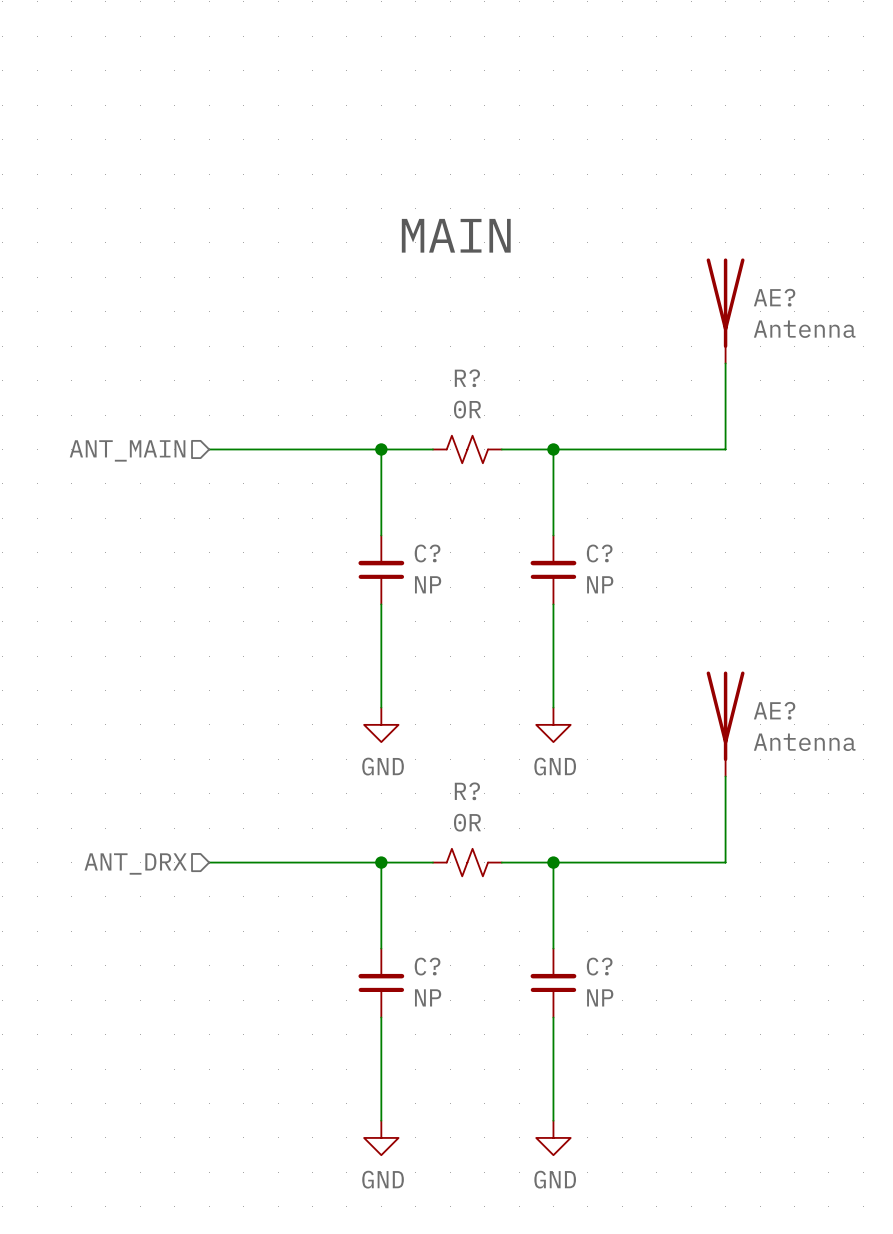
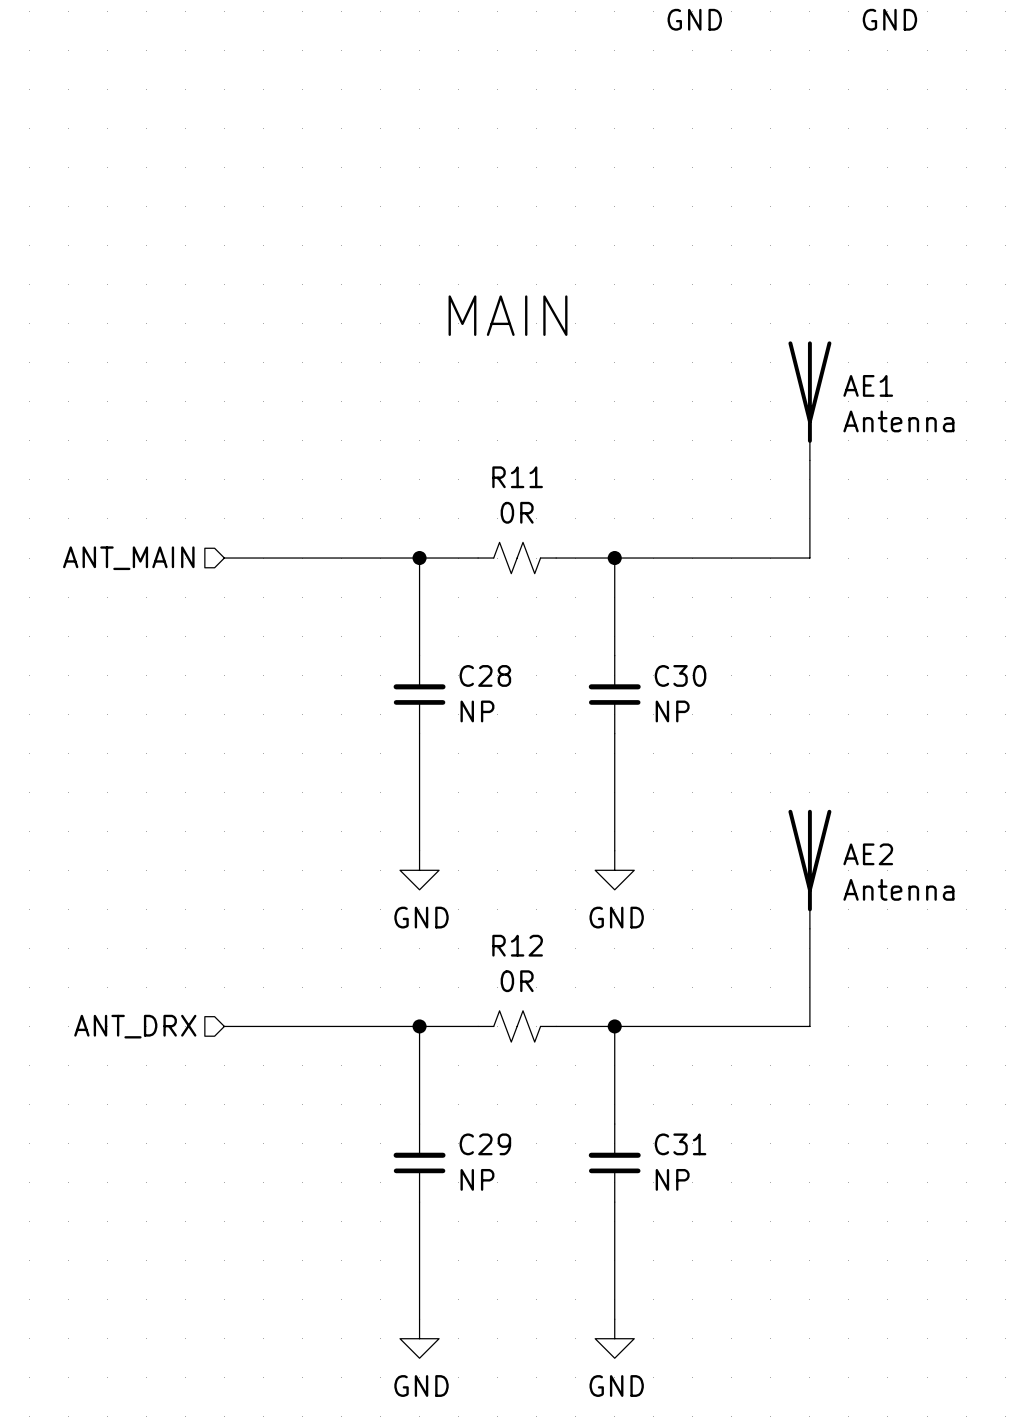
AE? name: AE? (774, 297) -> AE1 (868, 385)
R? name: R? (467, 378) -> R11 (517, 477)
C? name: C? (427, 553) -> C28 (485, 675)
C? name: C? (599, 553) -> C30 (680, 675)
AE? name: AE? (774, 710) -> AE2 (868, 854)
R? name: R? (467, 791) -> R12 (517, 945)
C? name: C? (427, 966) -> C29 (485, 1144)
C? name: C? (599, 966) -> C31 (680, 1144)

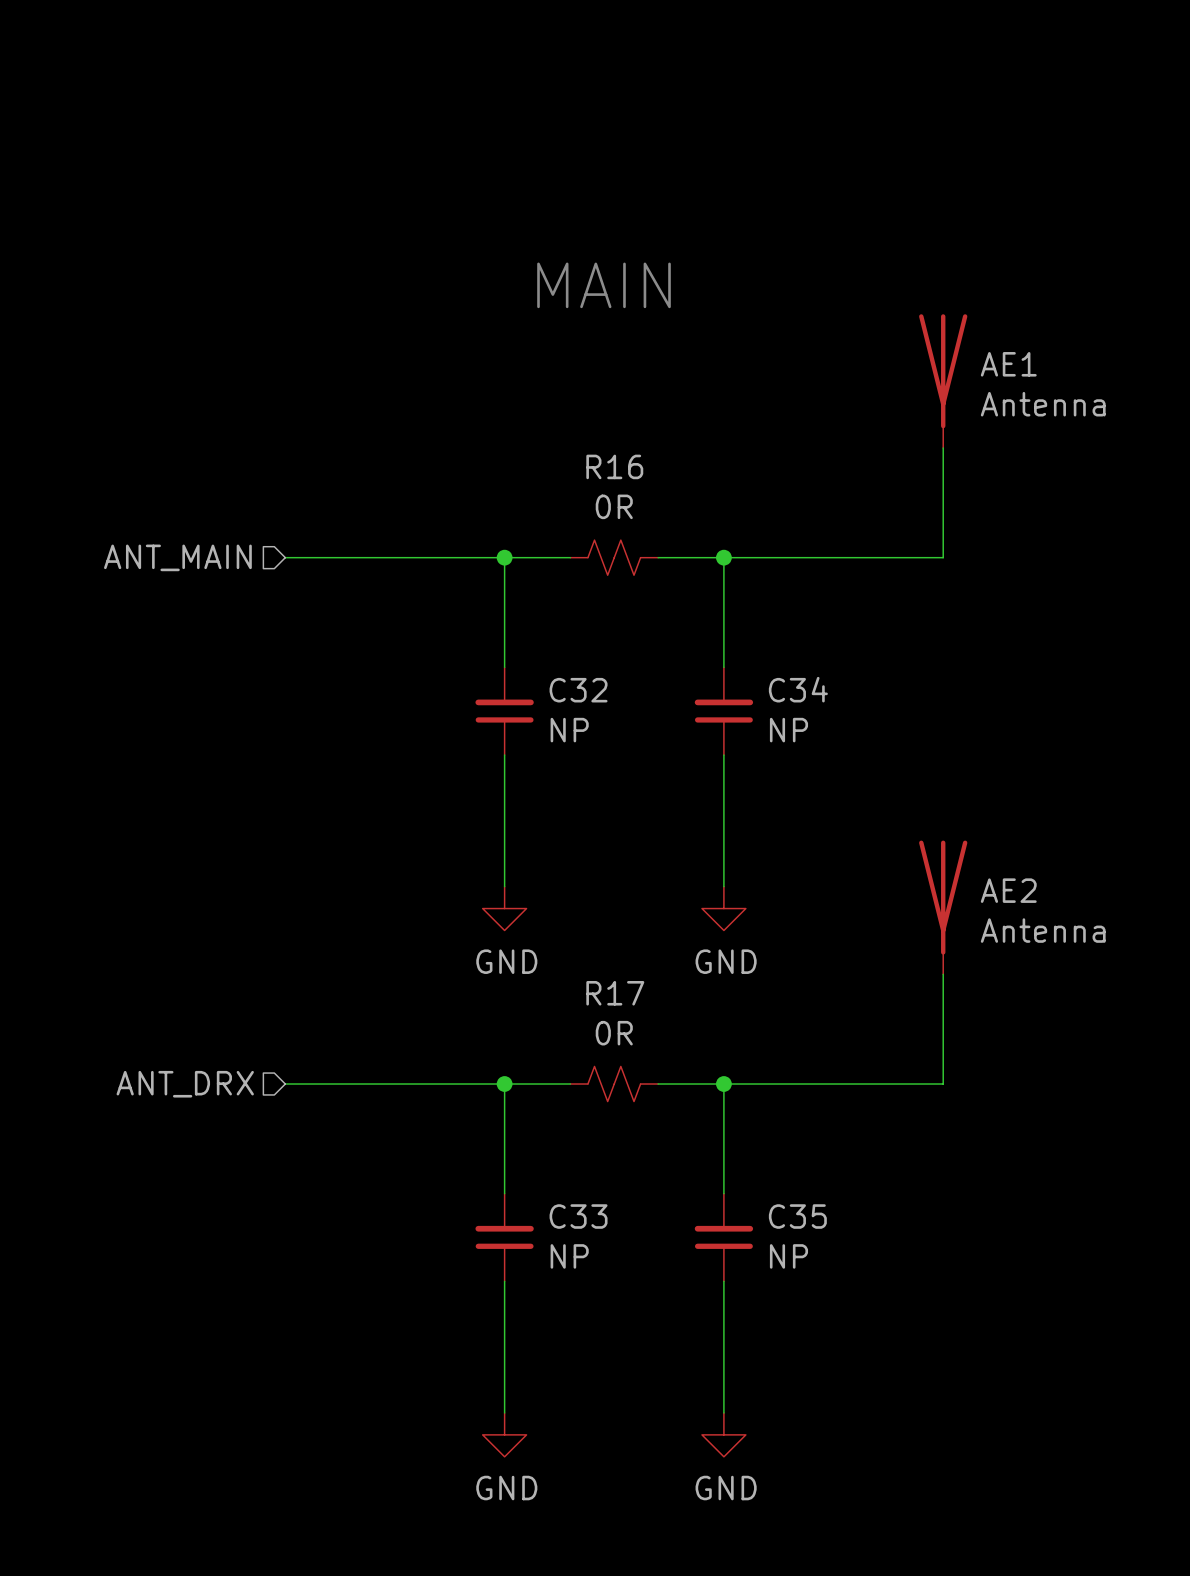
R11 name: R11 (517, 477) -> R16 (614, 466)
C28 name: C28 (485, 675) -> C32 (578, 690)
C30 name: C30 (680, 675) -> C34 (798, 689)
R12 name: R12 (517, 945) -> R17 (615, 993)
C29 name: C29 (485, 1144) -> C33 (578, 1216)
C31 name: C31 (680, 1144) -> C35 (797, 1216)

